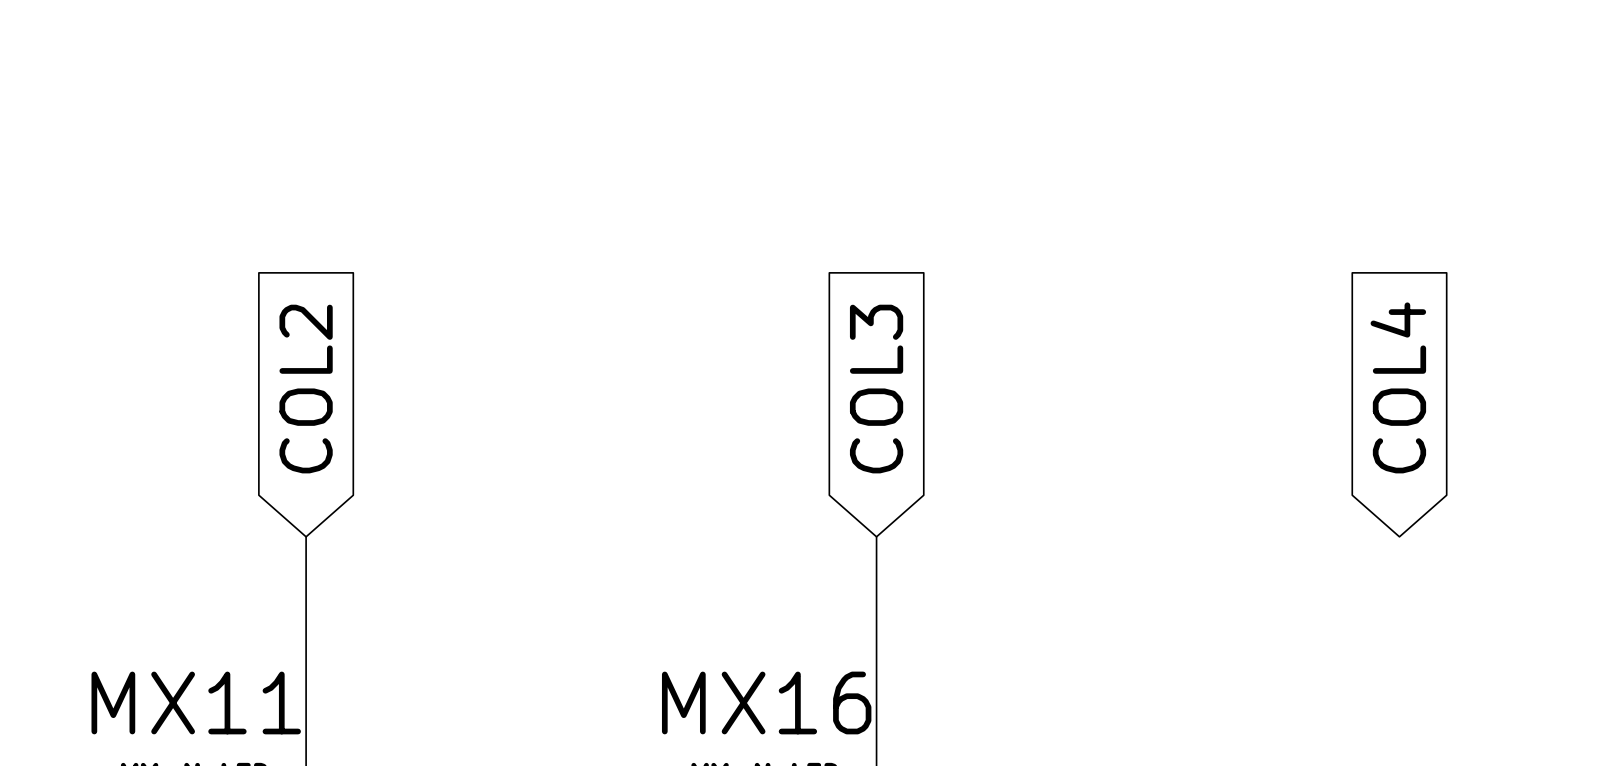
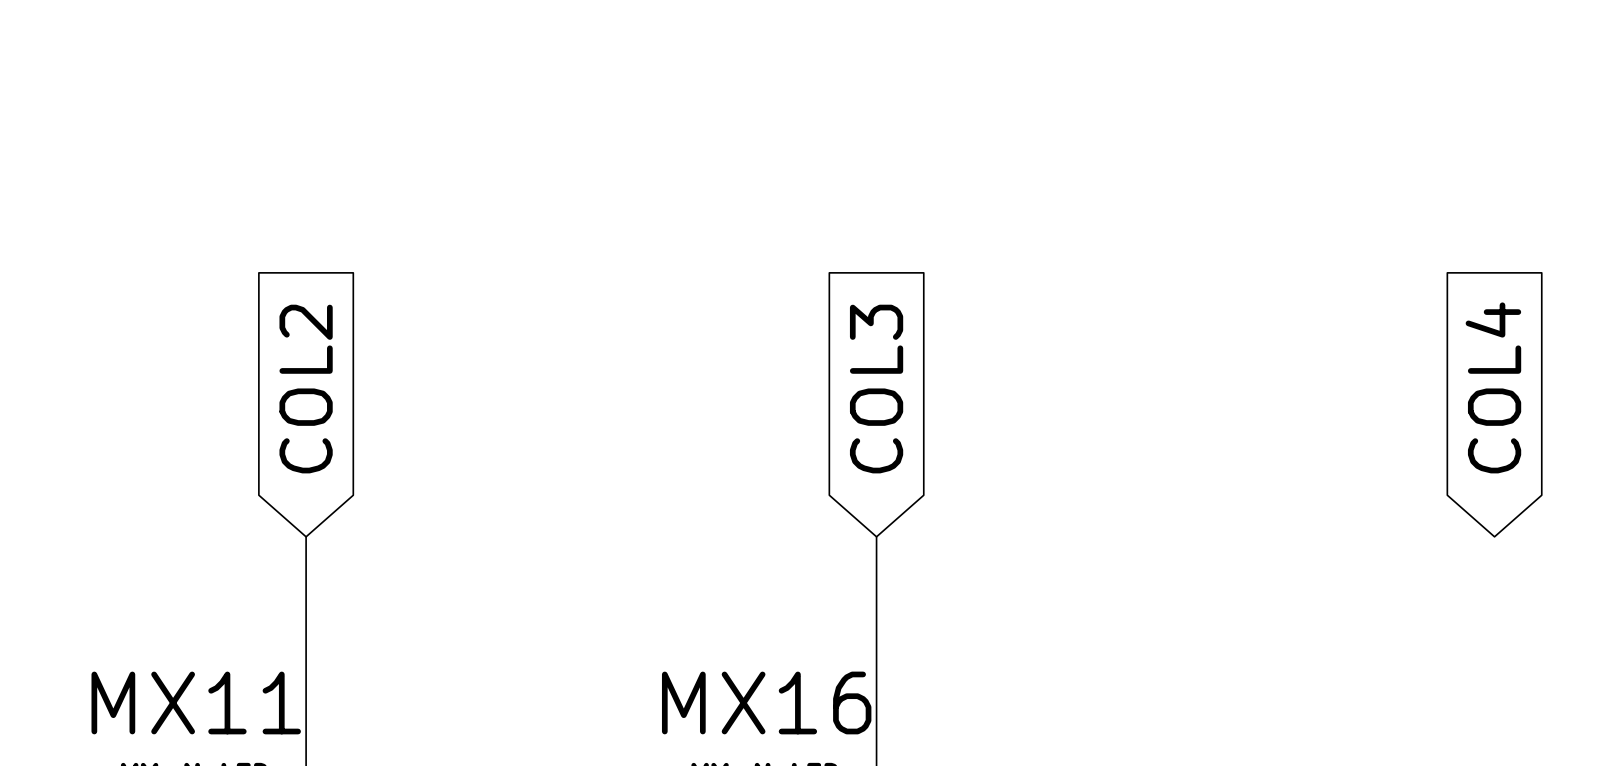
global label position: COL4 (1398, 387) -> COL4 (1493, 387)

